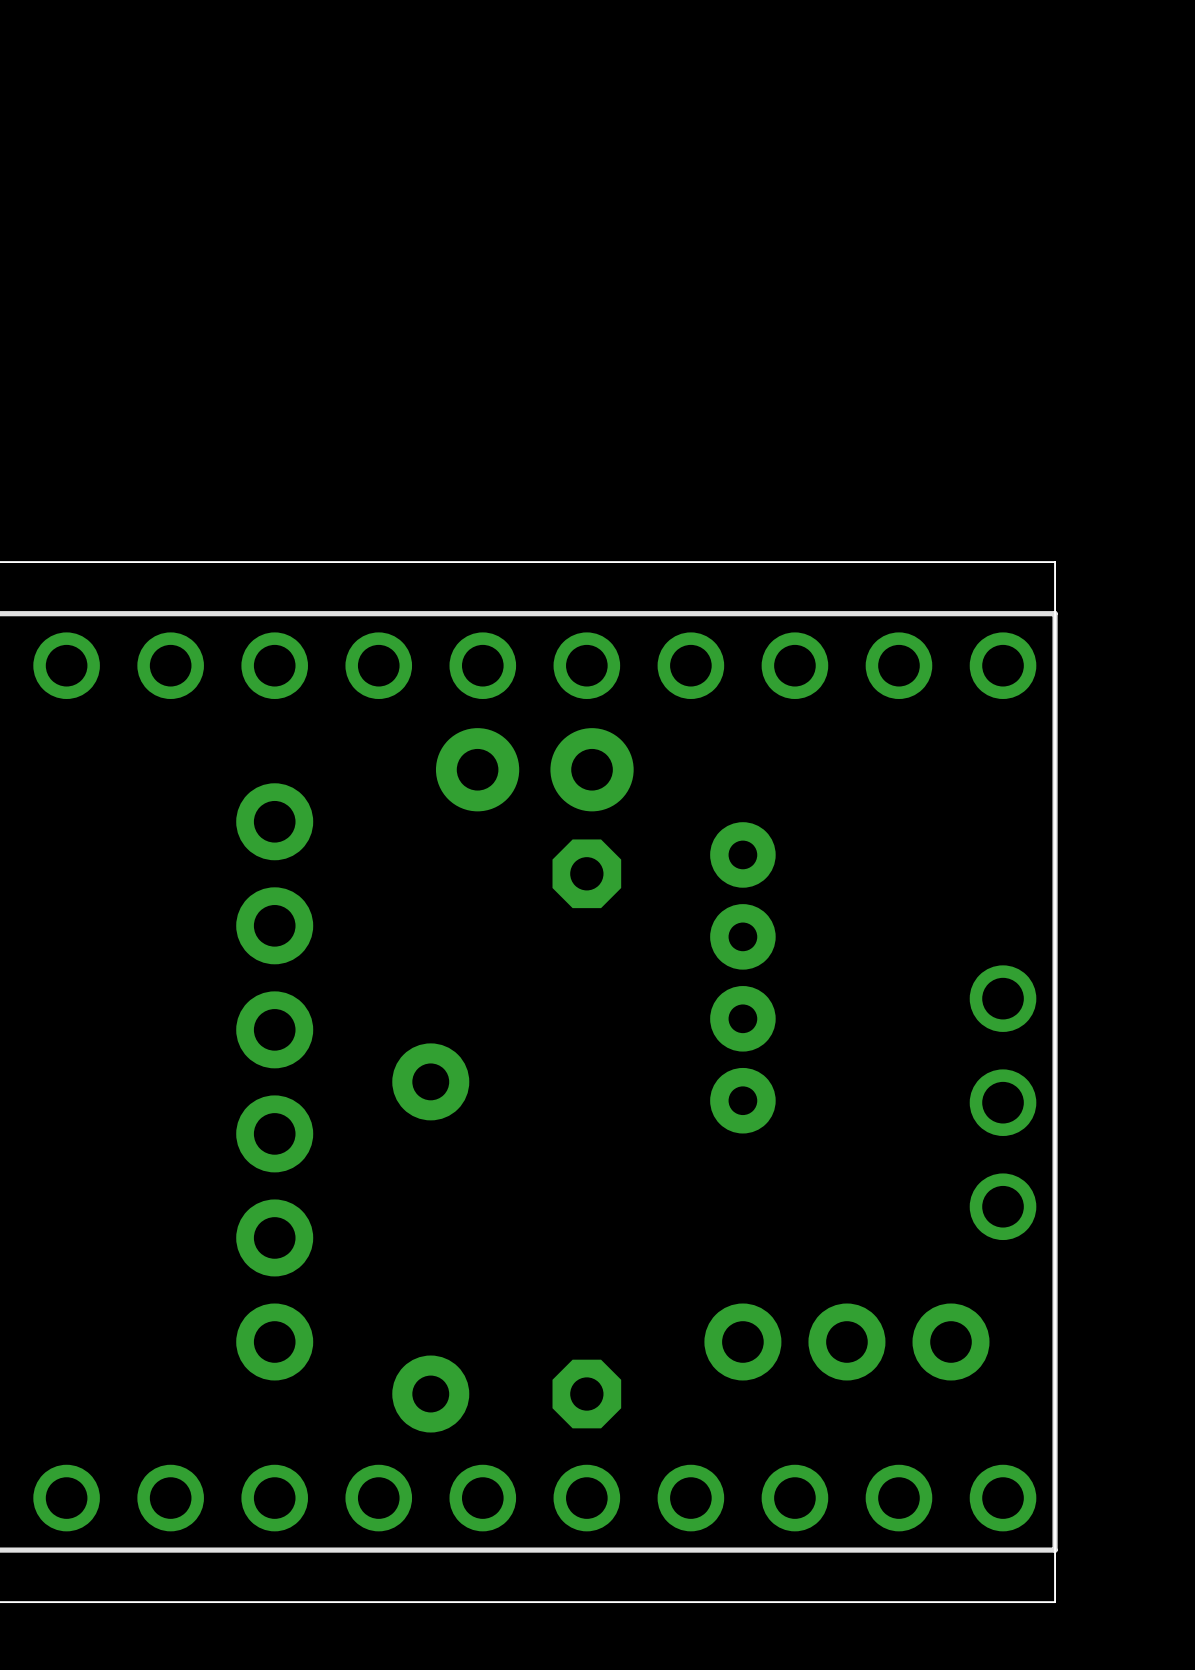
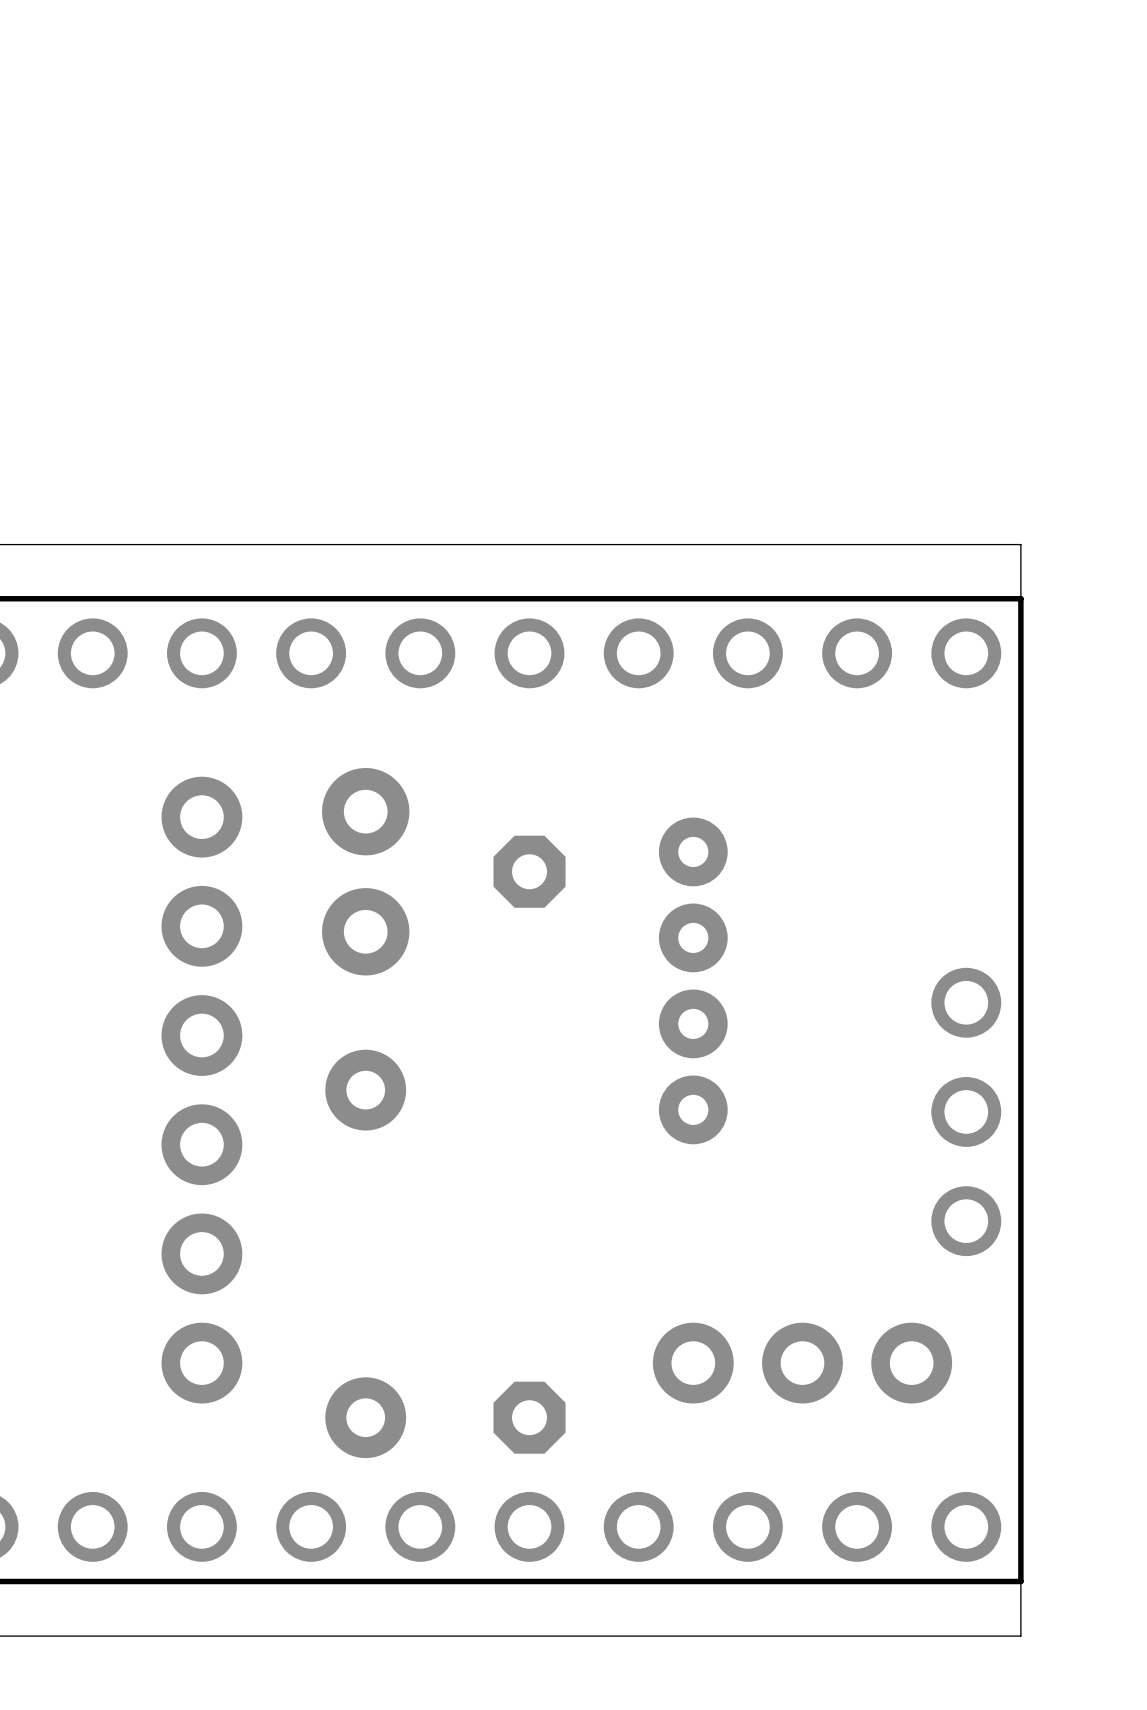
part rotation: 0° (534, 769) -> 90° clockwise (365, 871)
part position: (534, 769) -> (365, 871)

